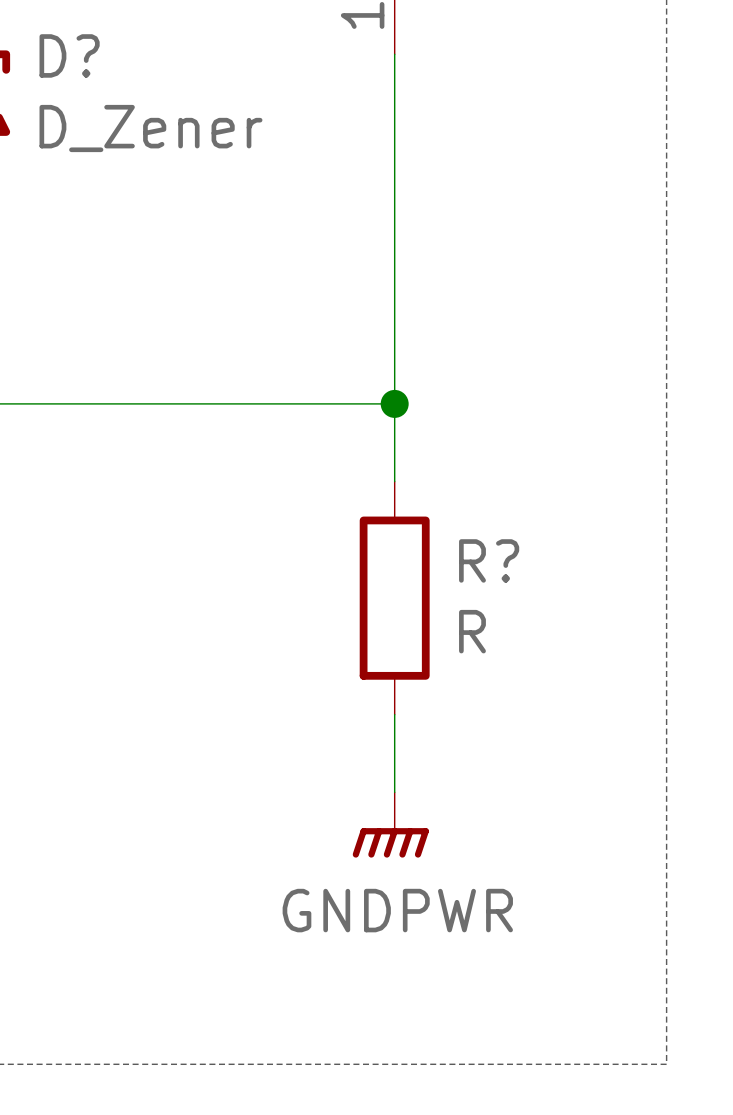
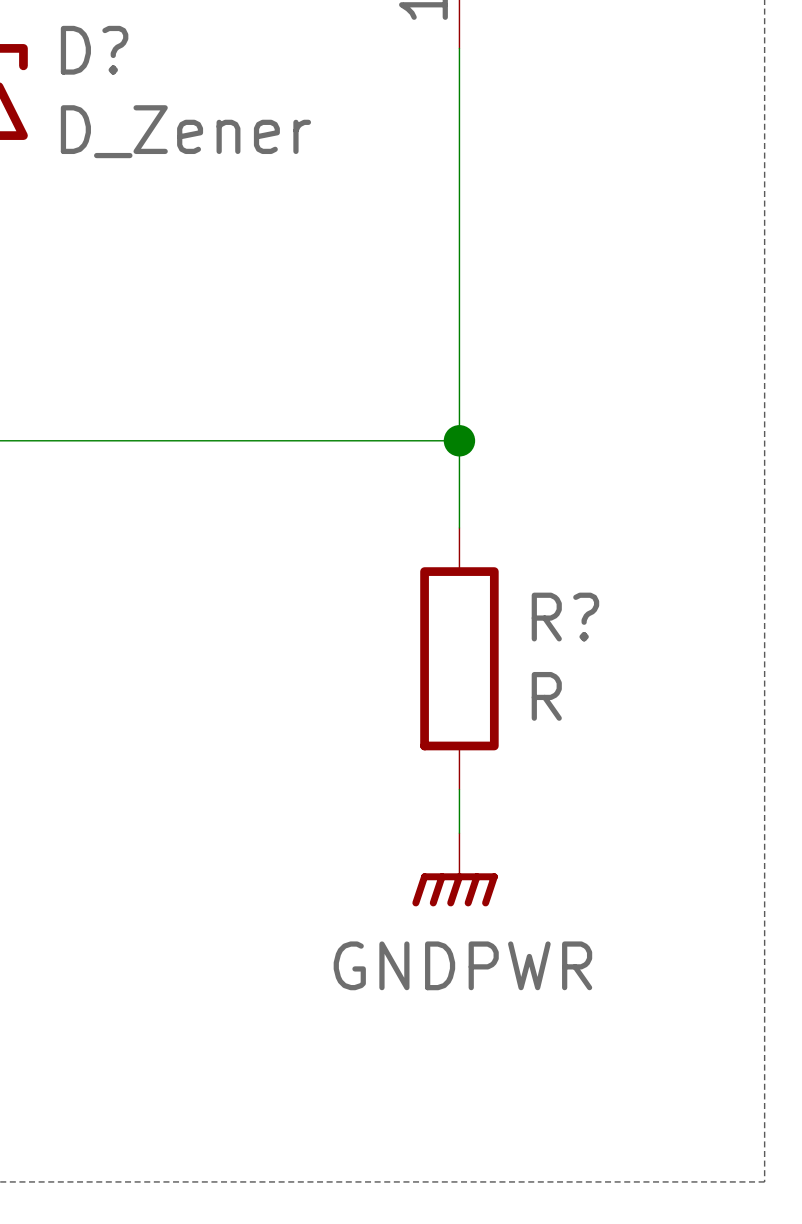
power symbol position: GNDPWR (390, 825) -> GNDPWR (455, 869)

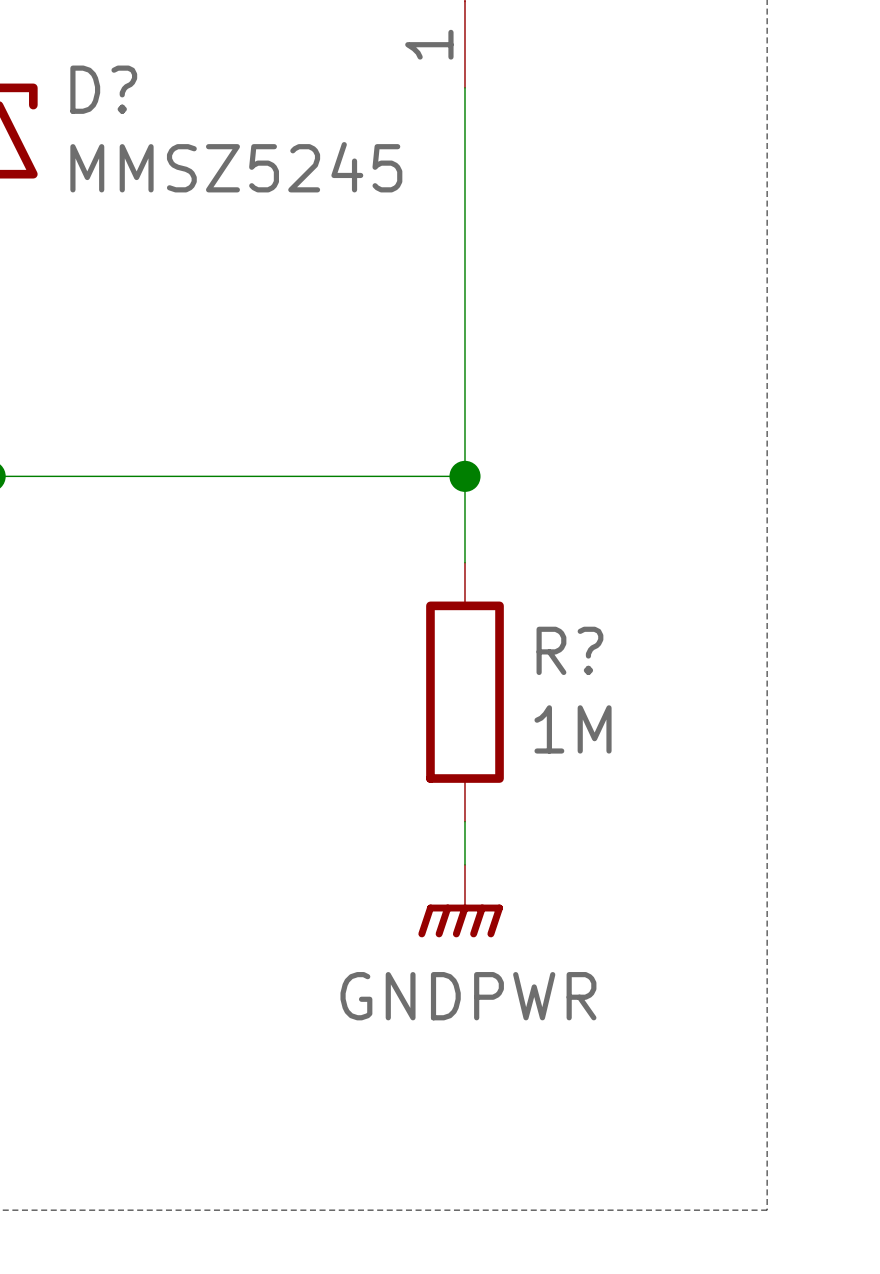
D? value: D_Zener (185, 131) -> MMSZ5245 (236, 167)
R? value: R (546, 696) -> 1M (573, 729)

